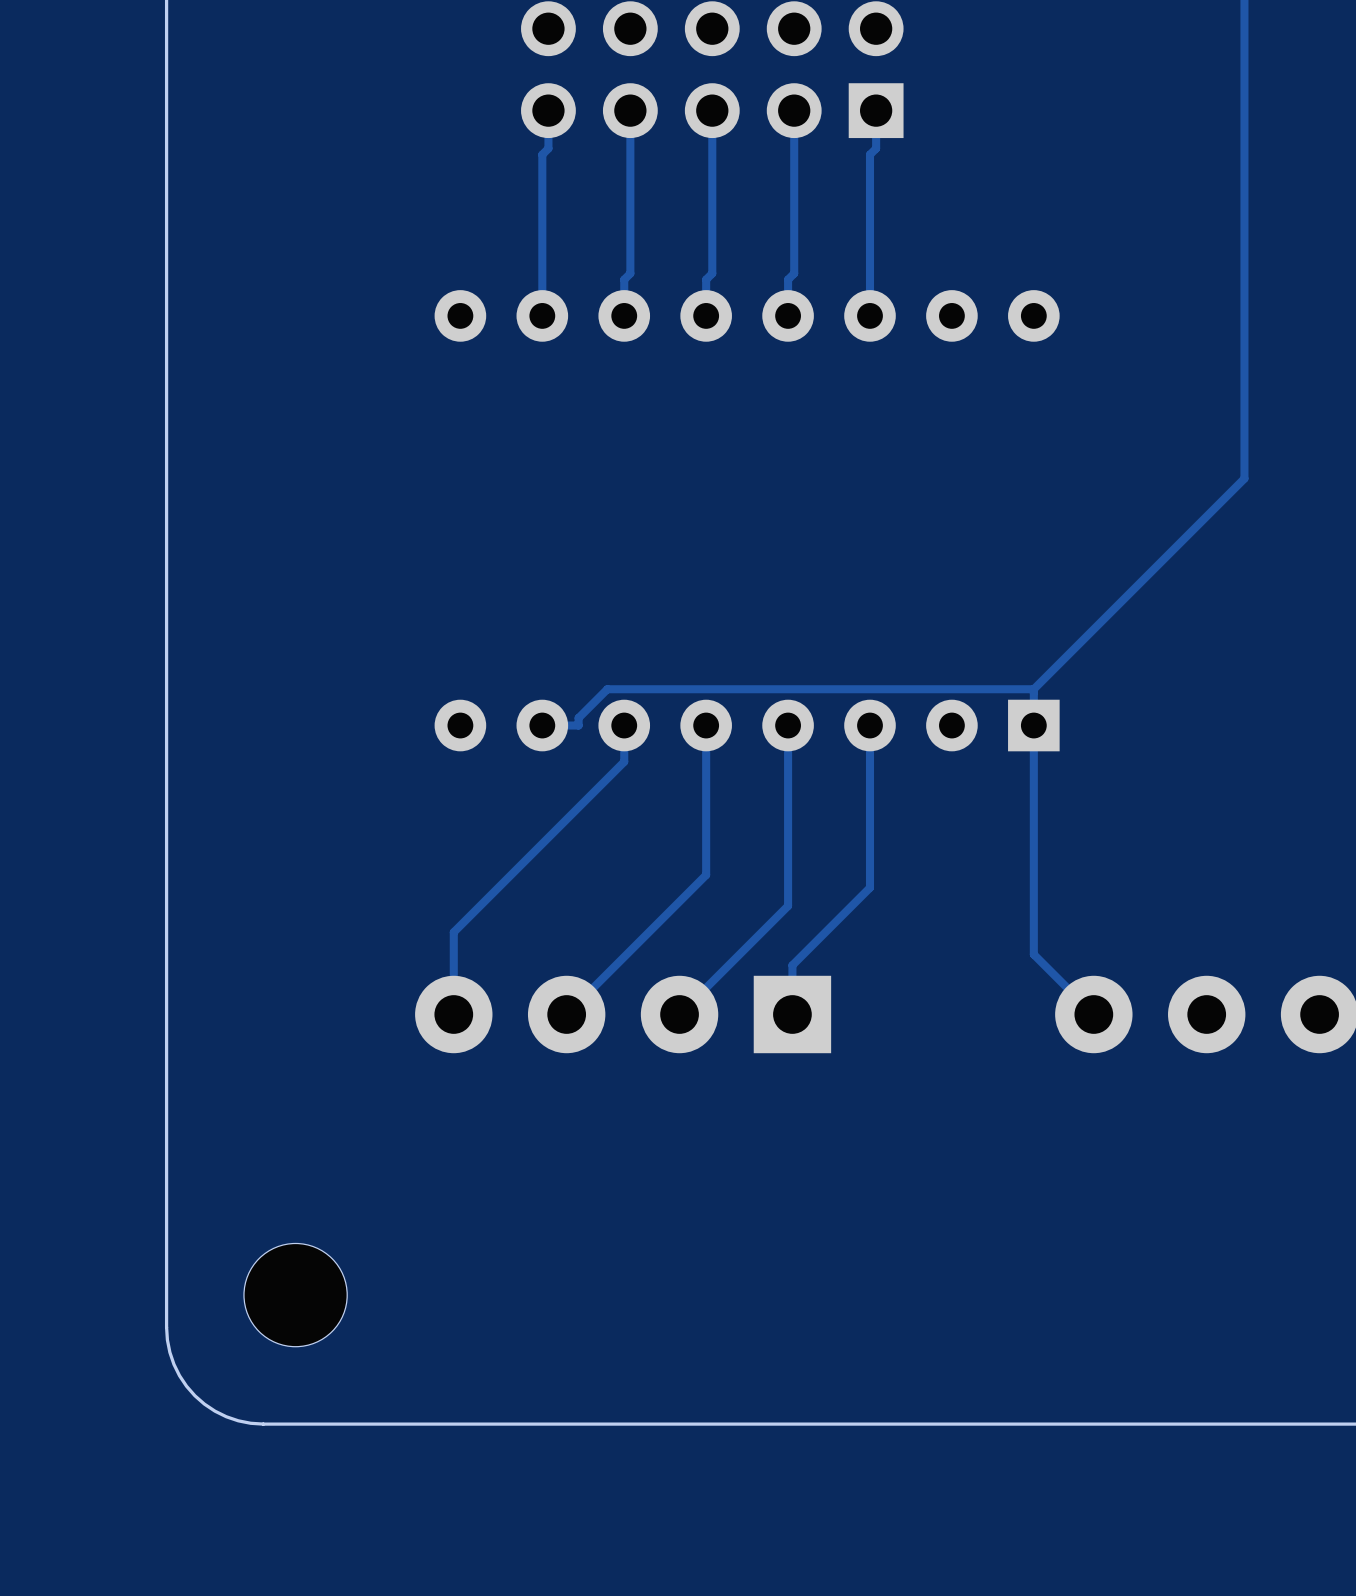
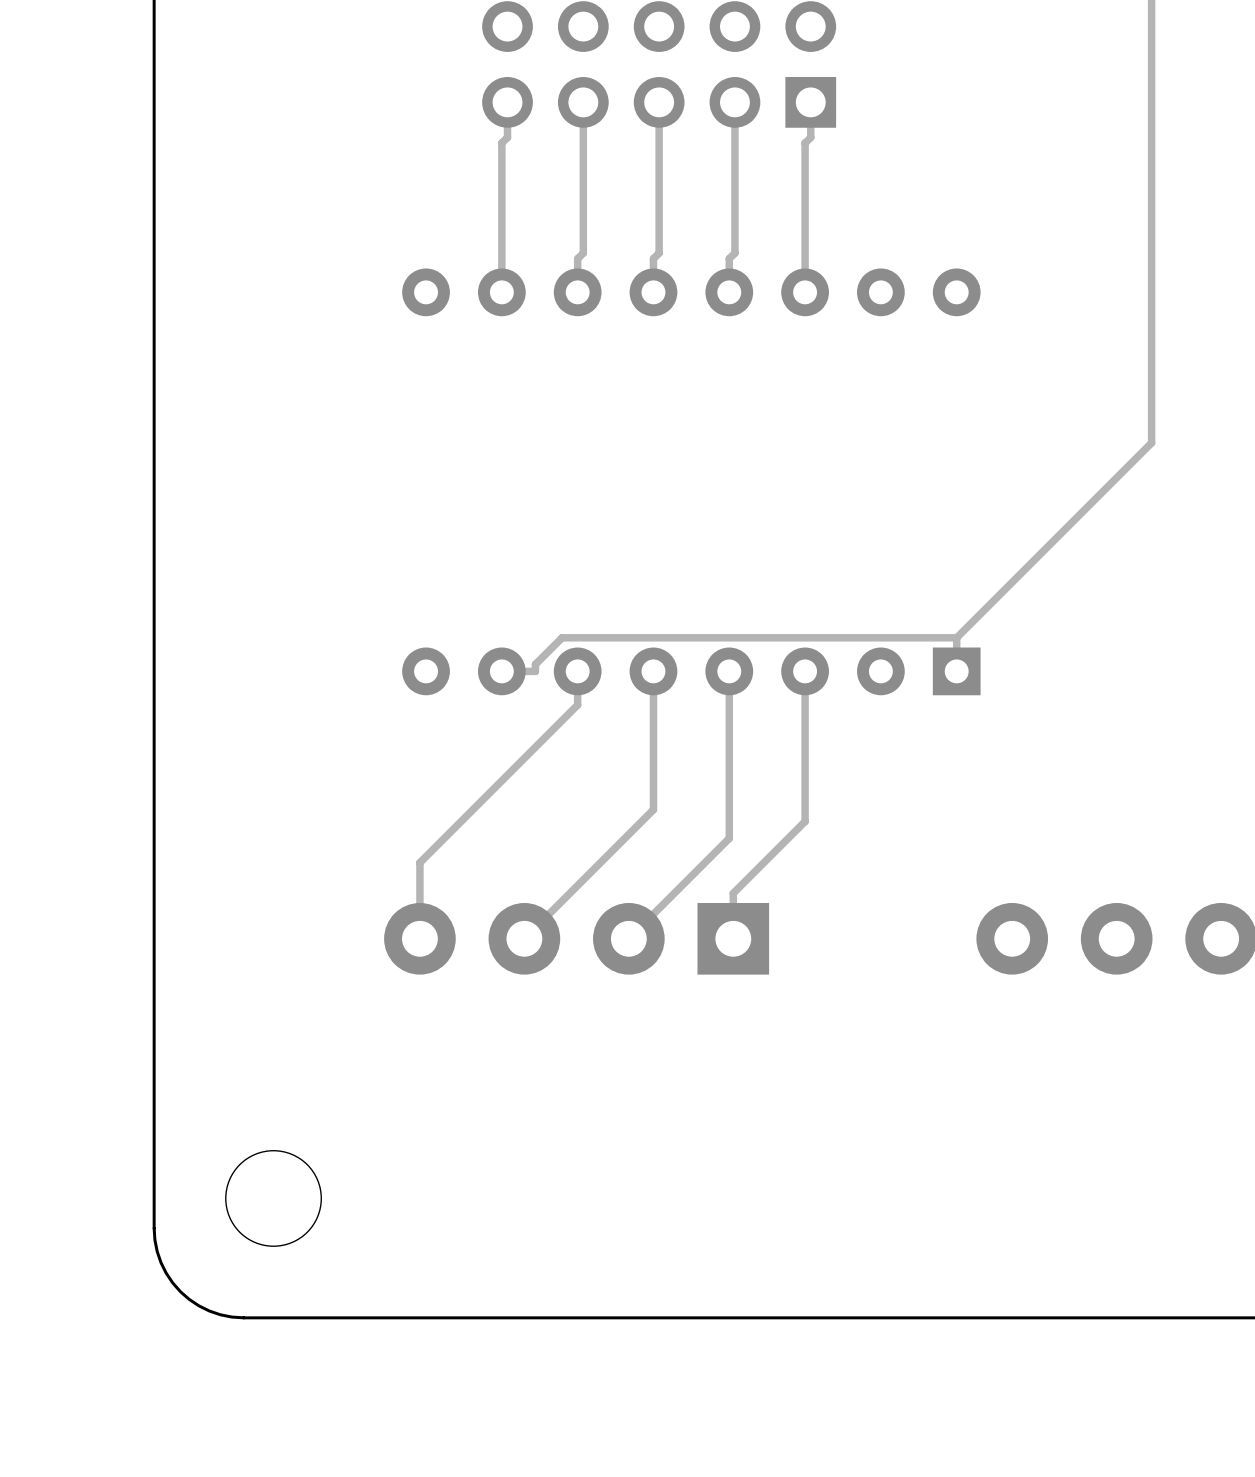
track: (1033, 725) (1033, 954) (1093, 1014) -> none

